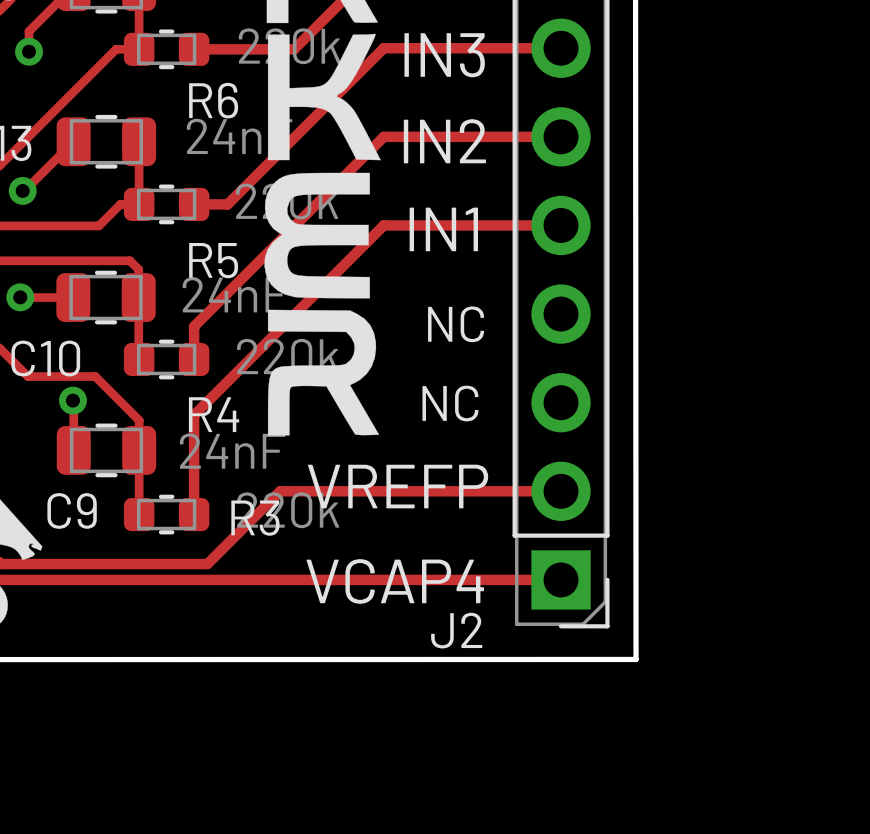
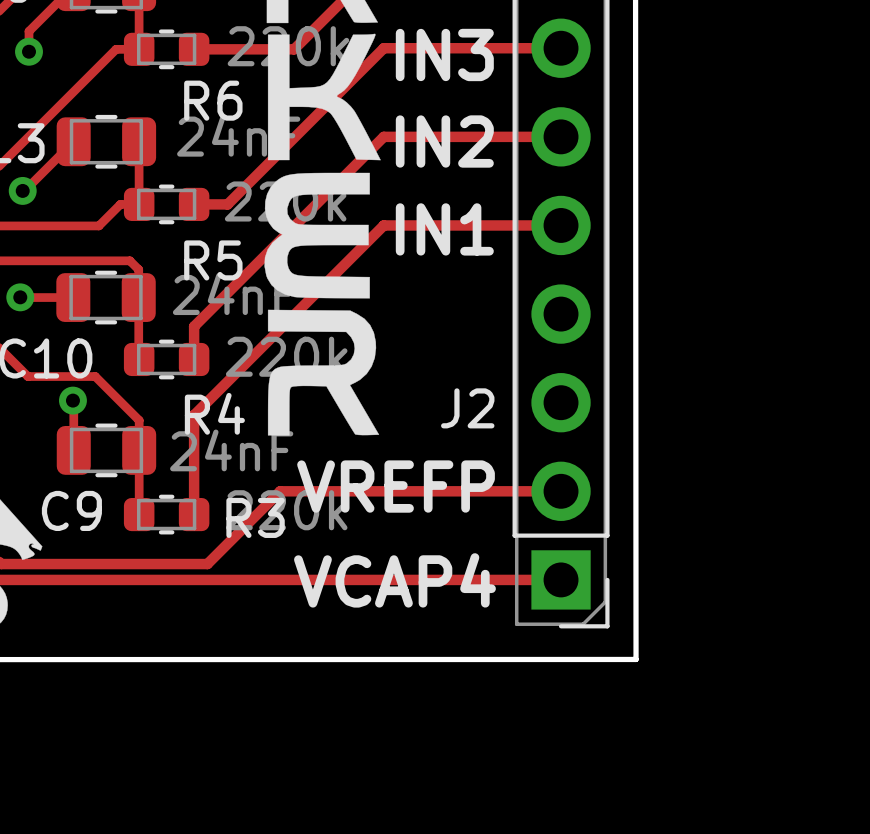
text: NC (456, 324) -> none
text: NC (450, 403) -> none
J2 name position: J2 (456, 630) -> J2 (467, 408)

